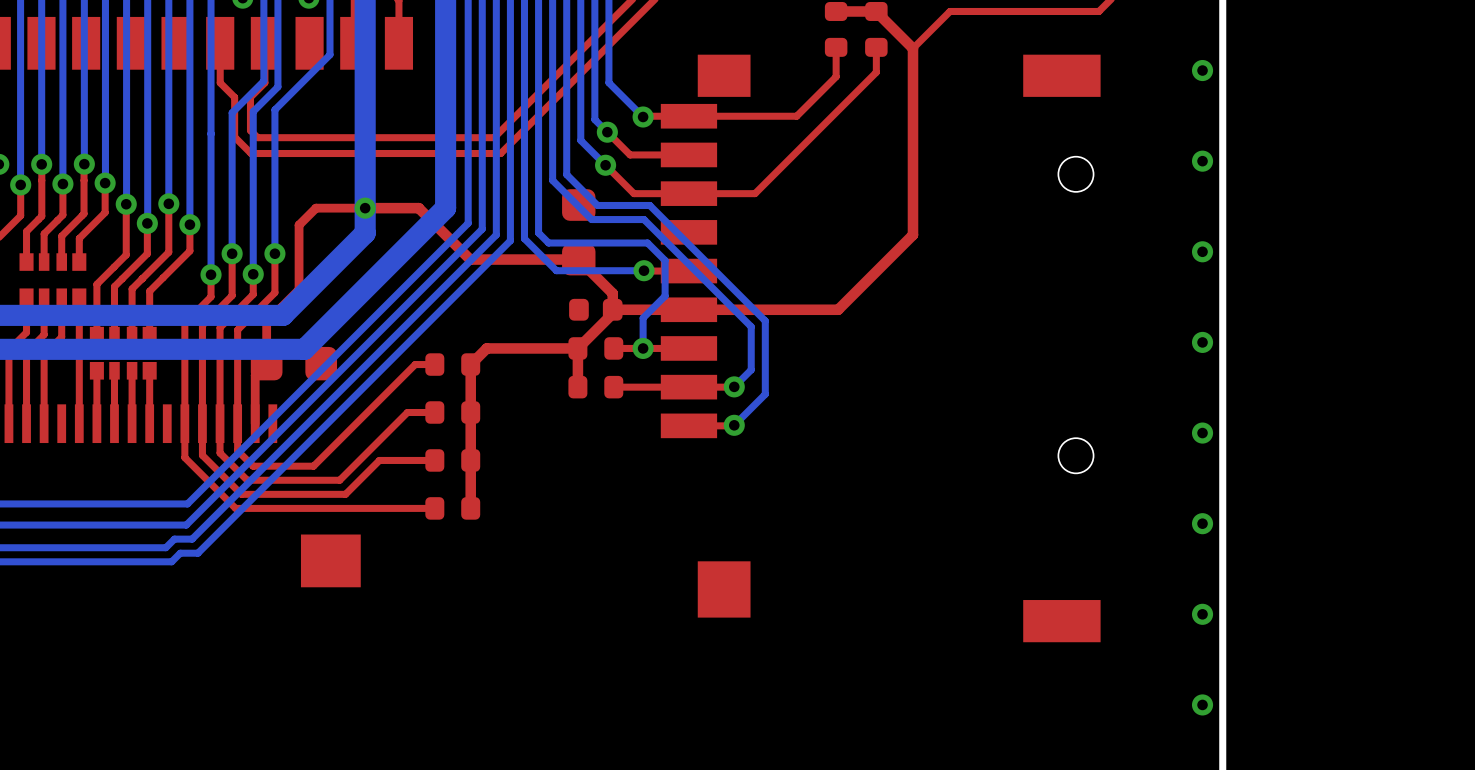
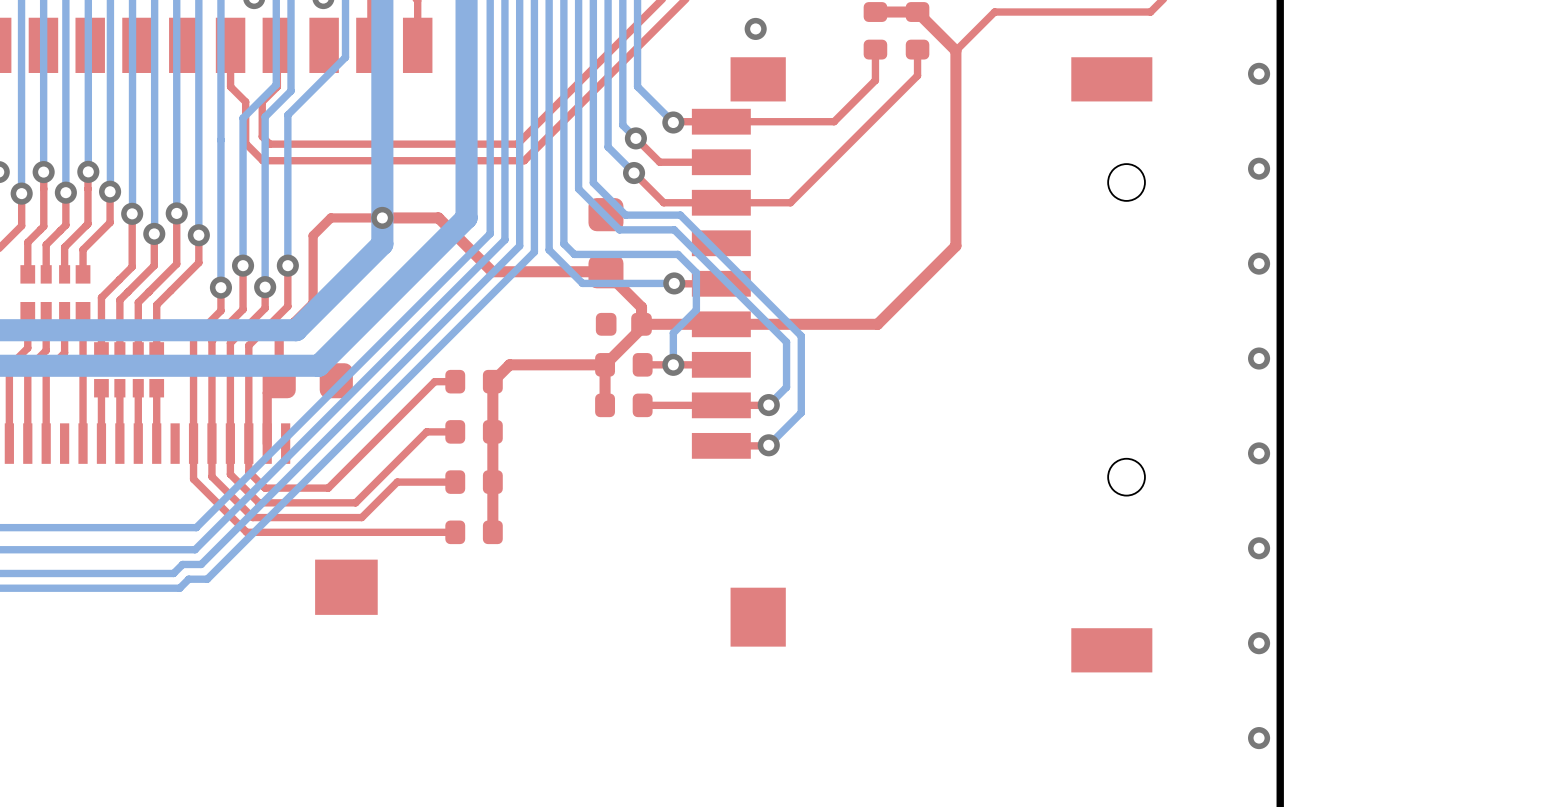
via: none -> (755, 28)

